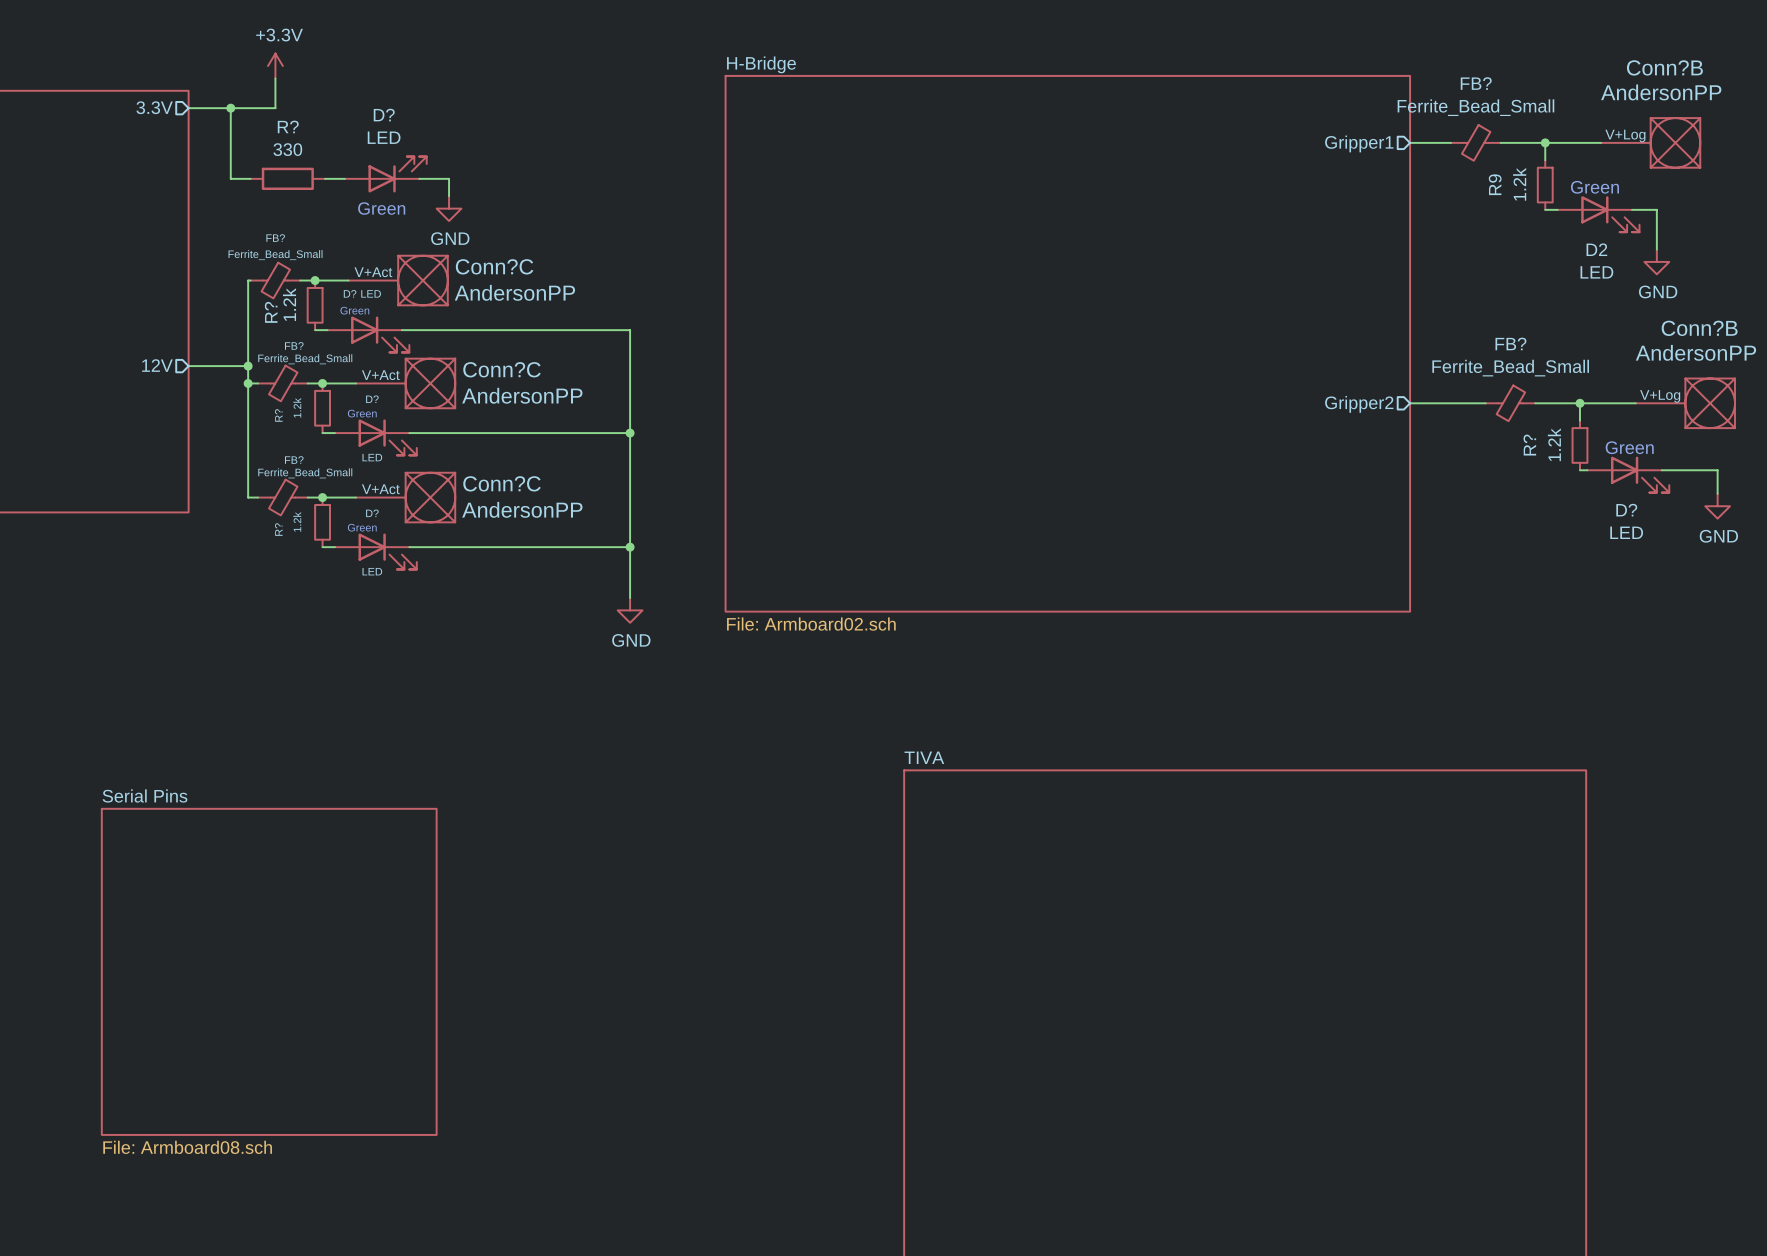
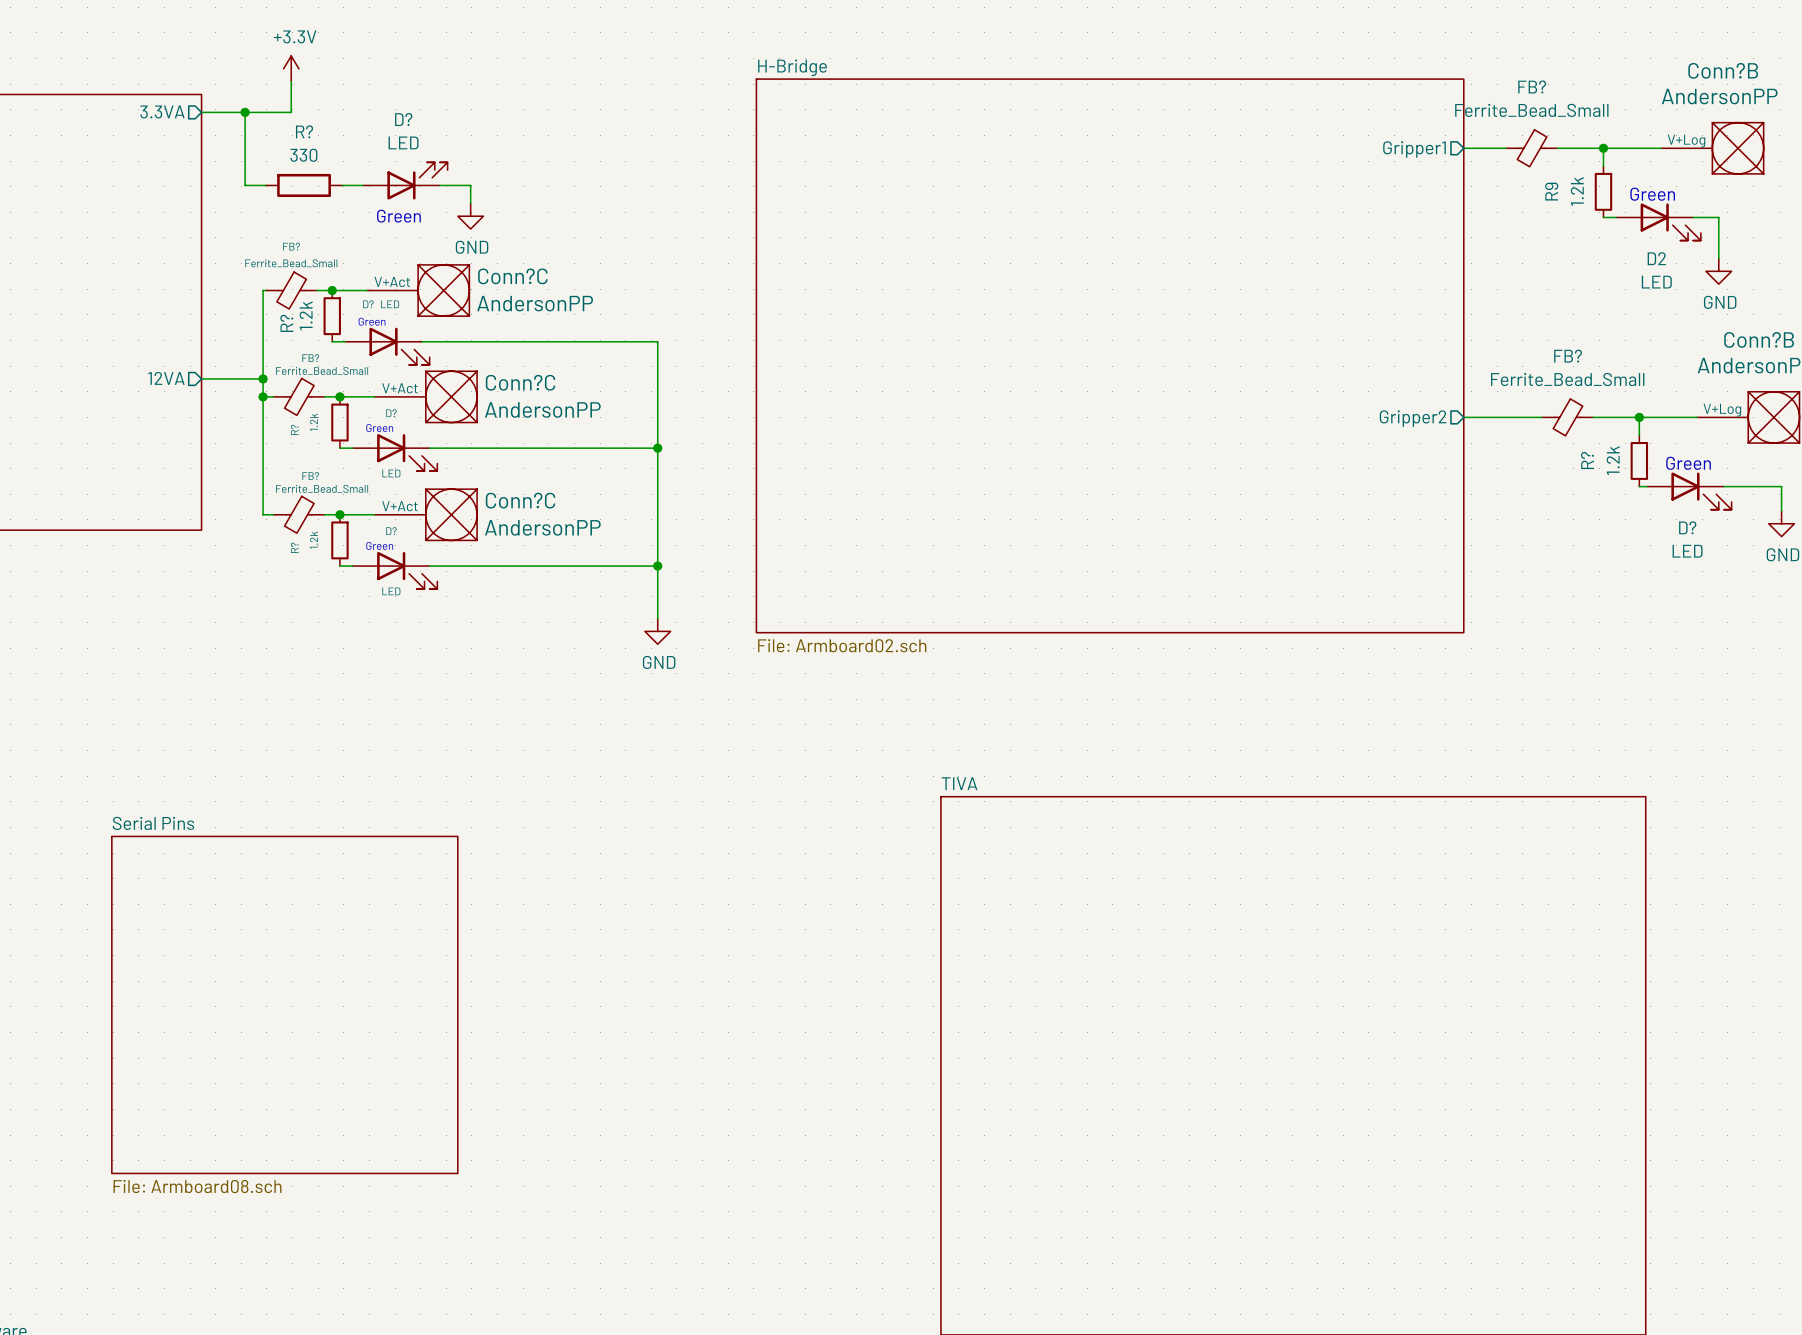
sheet pin: 3.3V (154, 107) -> 3.3VA (162, 112)
sheet pin: 12V (157, 365) -> 12VA (166, 378)

